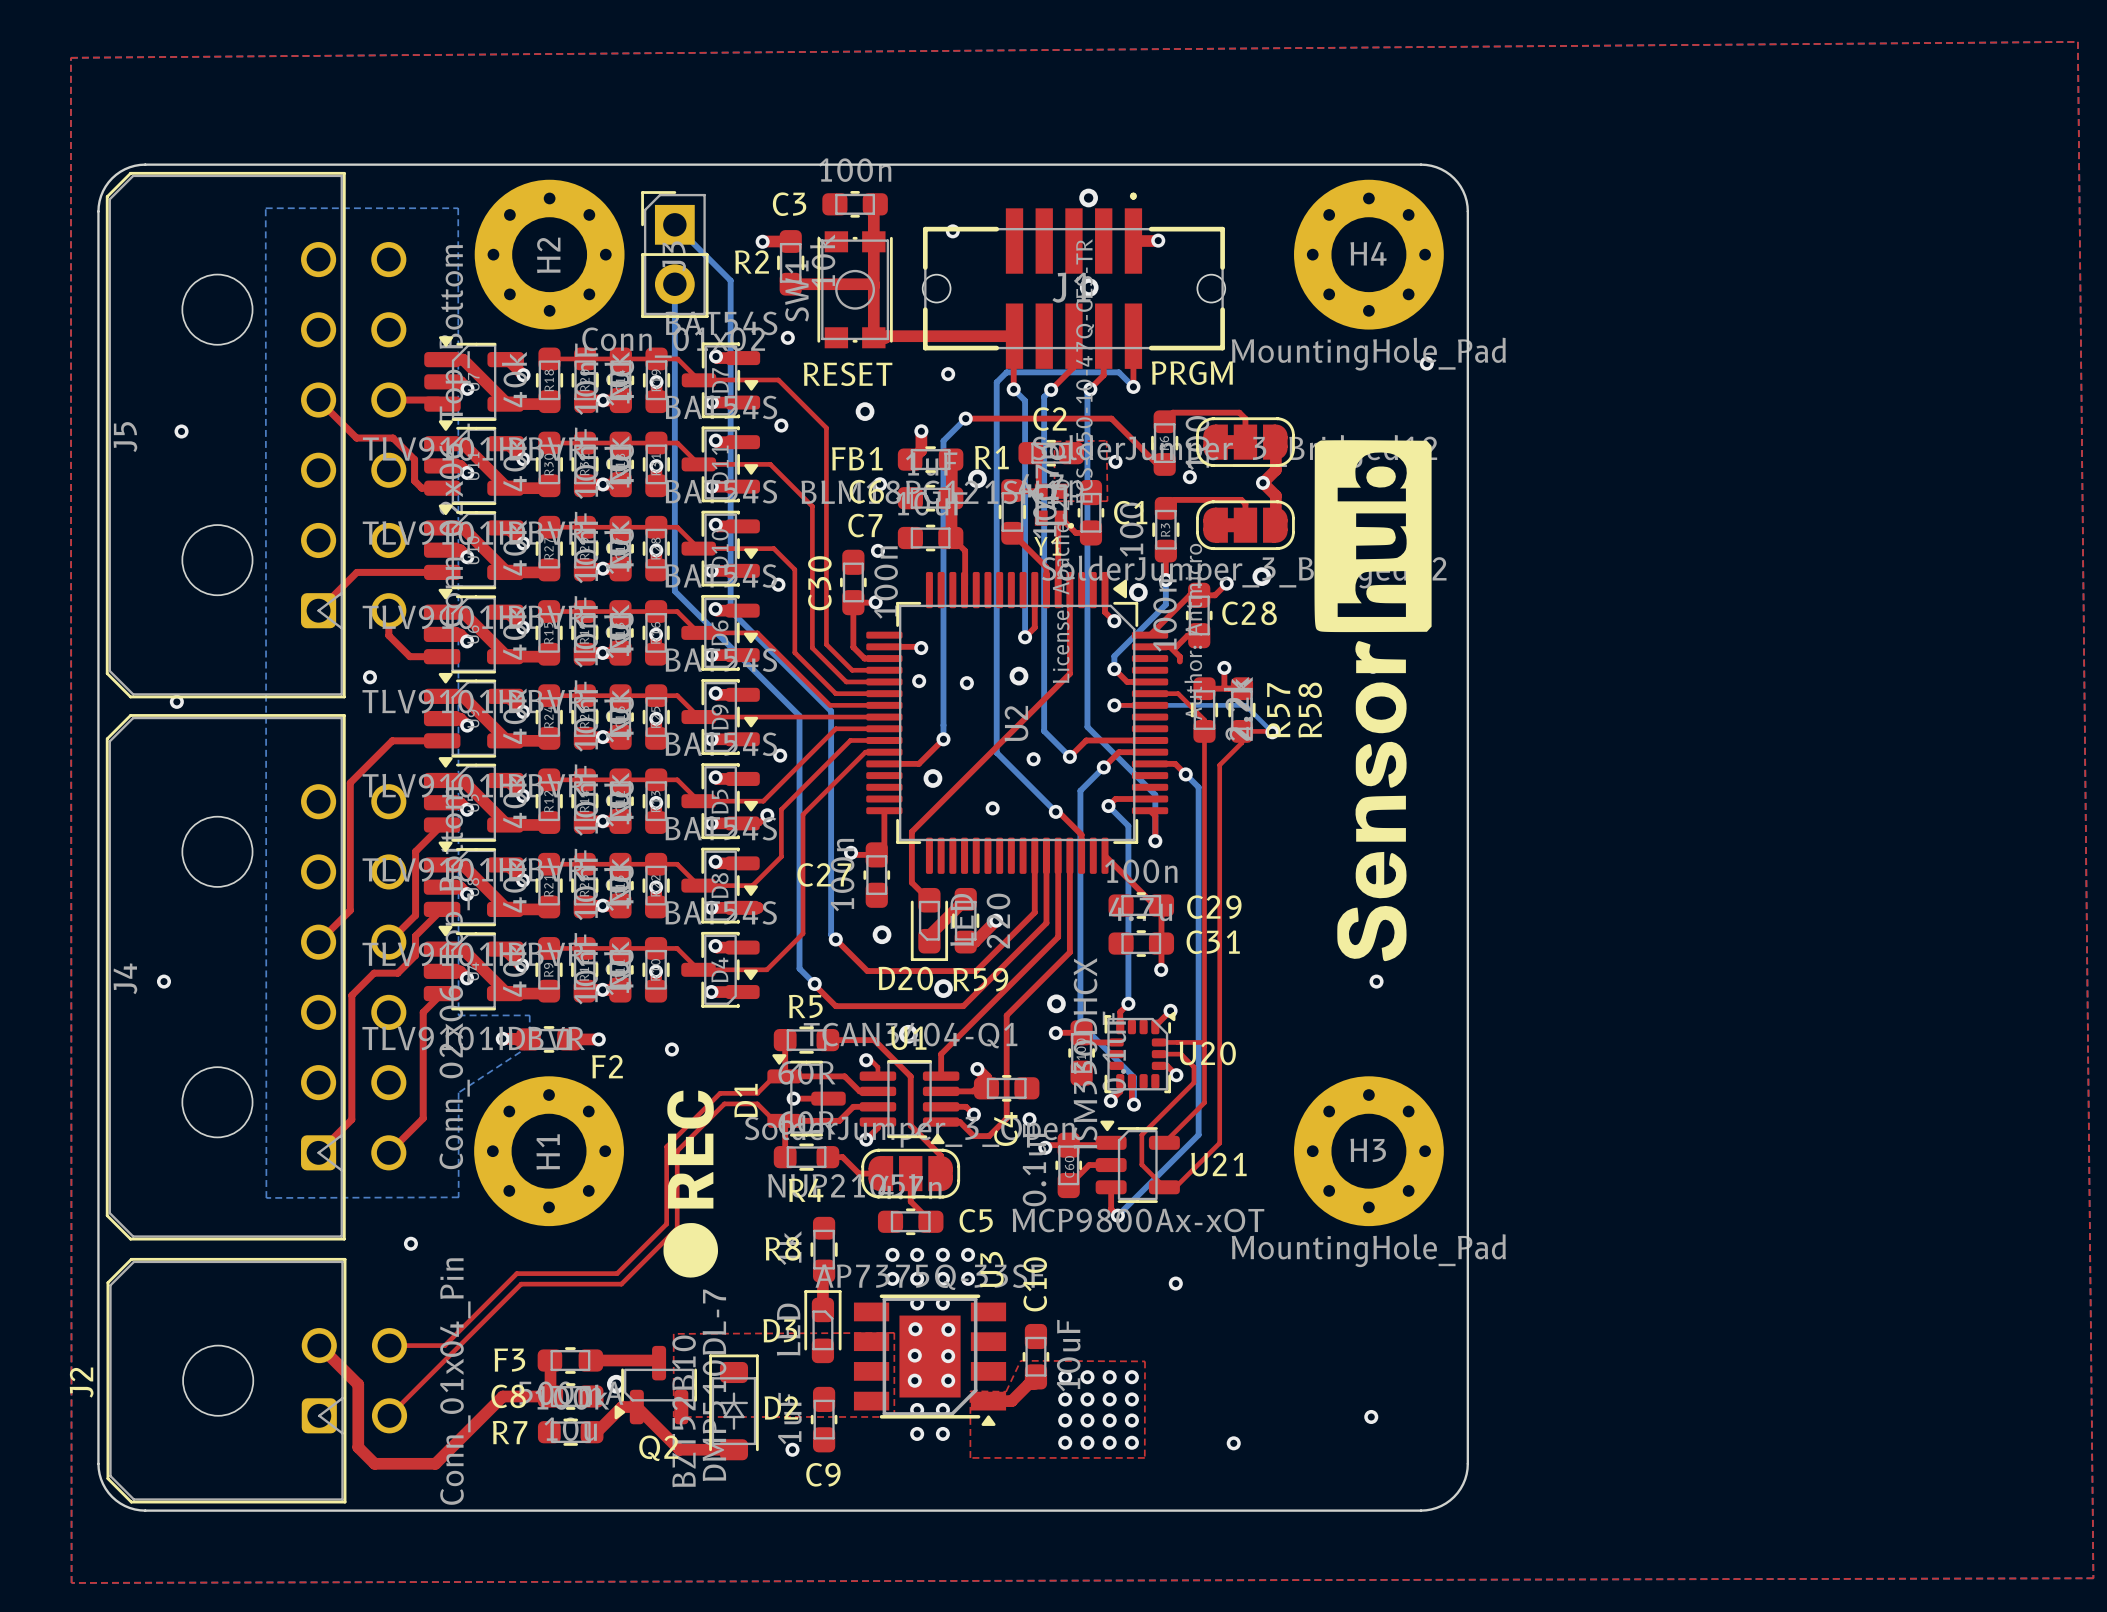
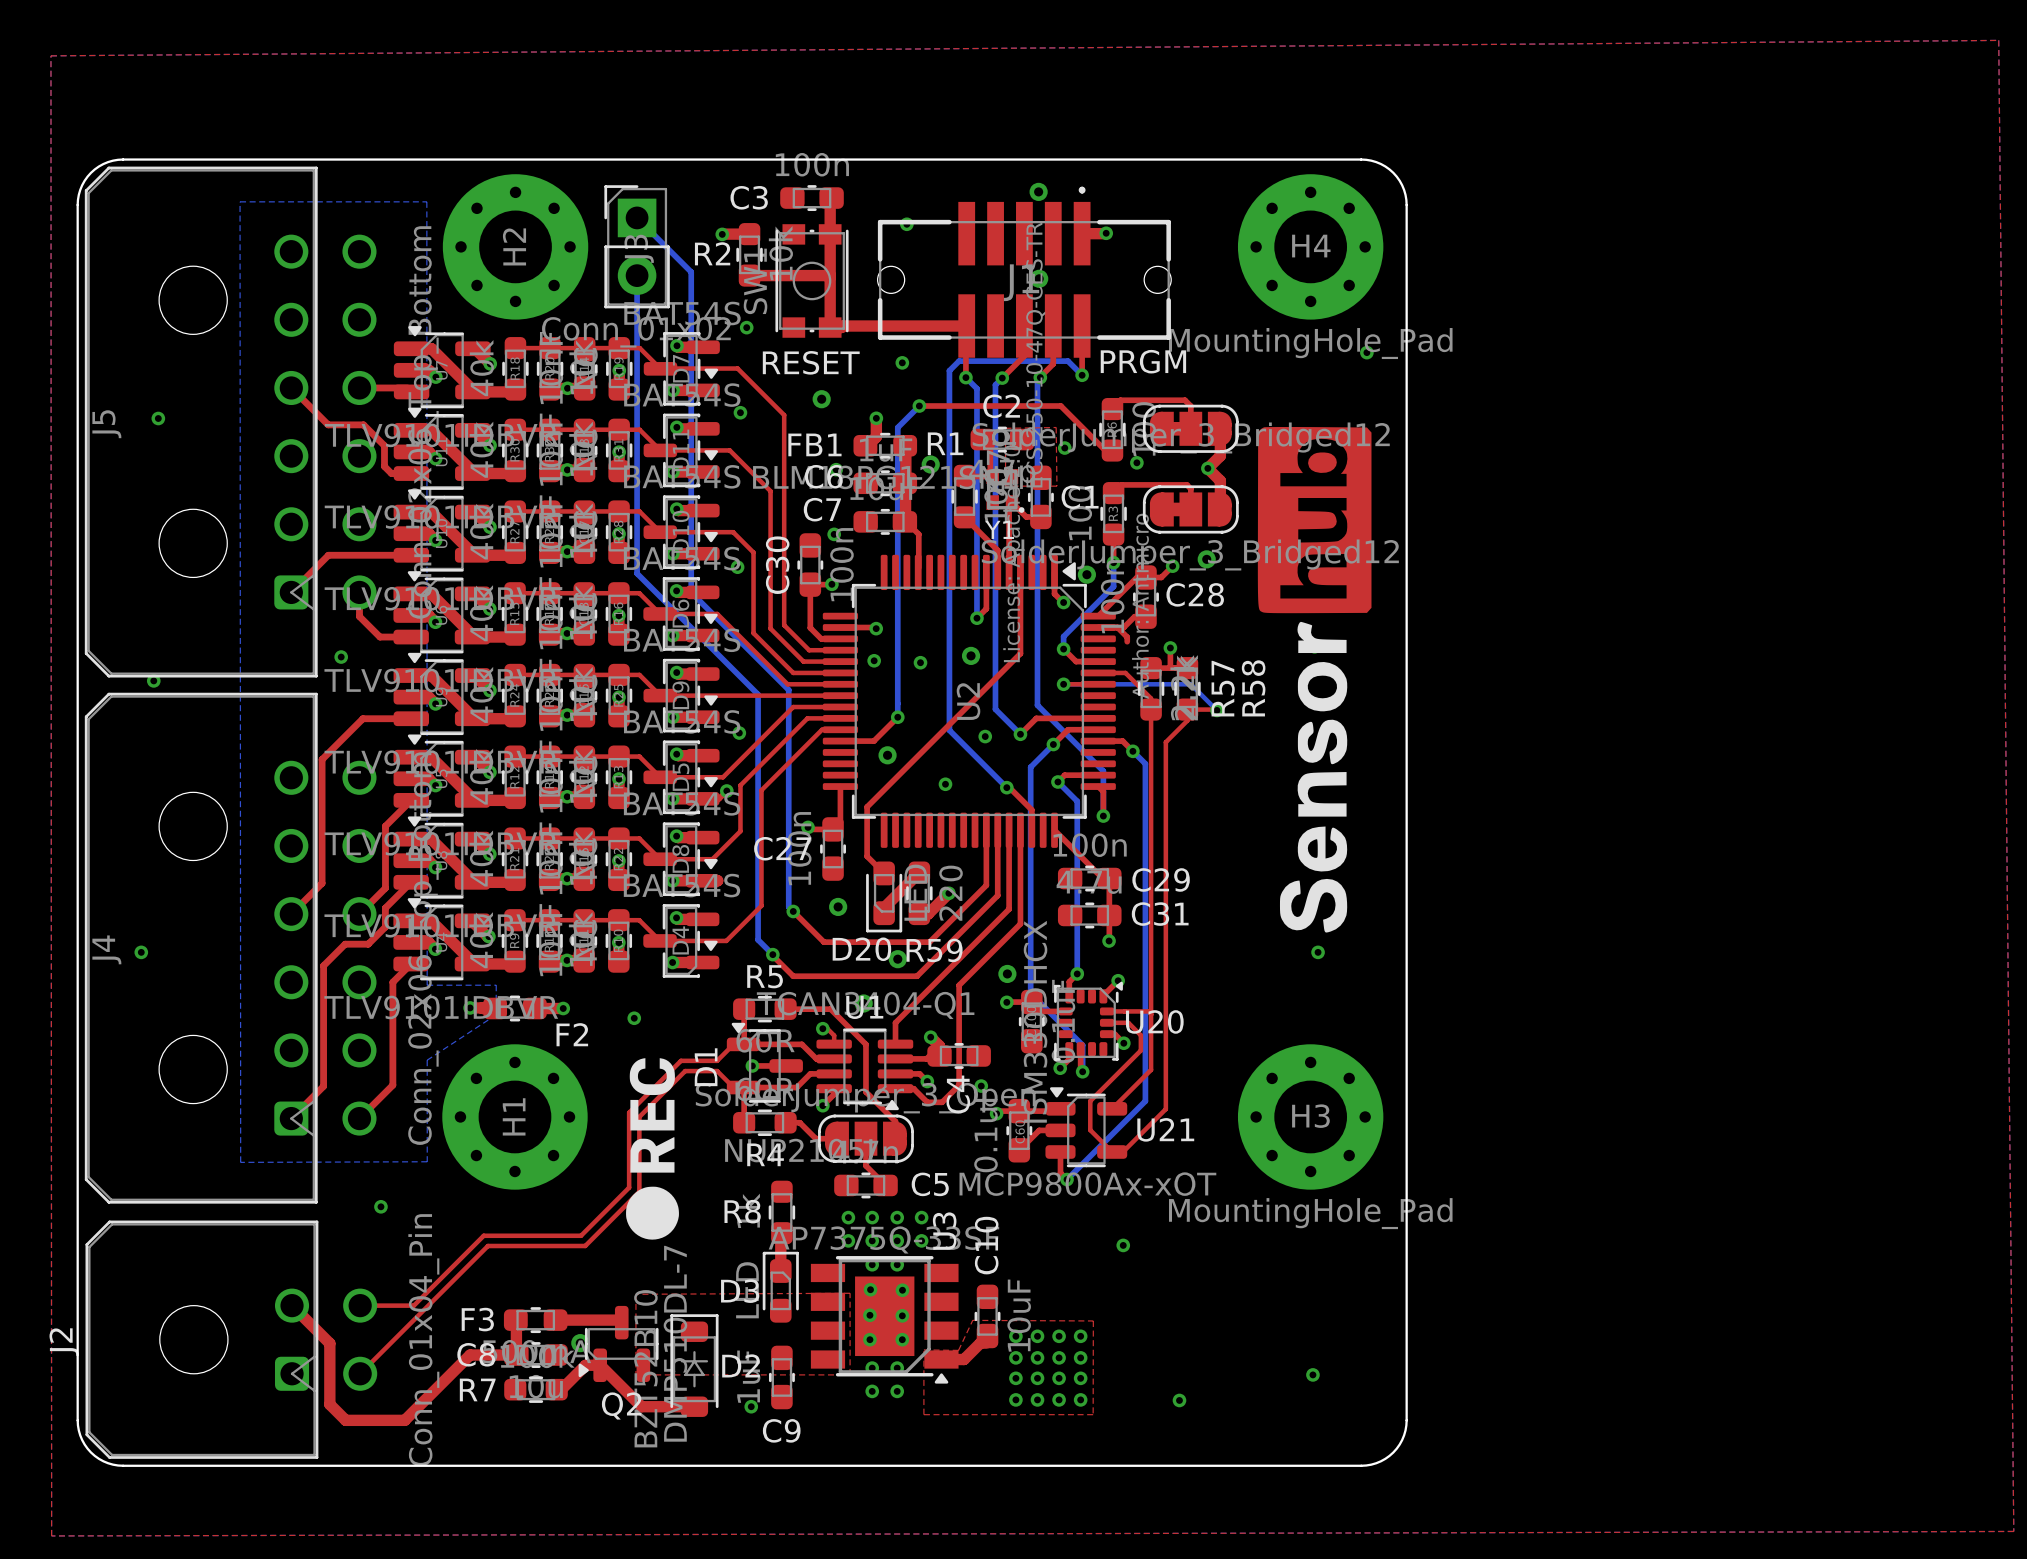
drawing shape: [1314, 440, 1432, 962] -> [1257, 426, 1372, 933]

